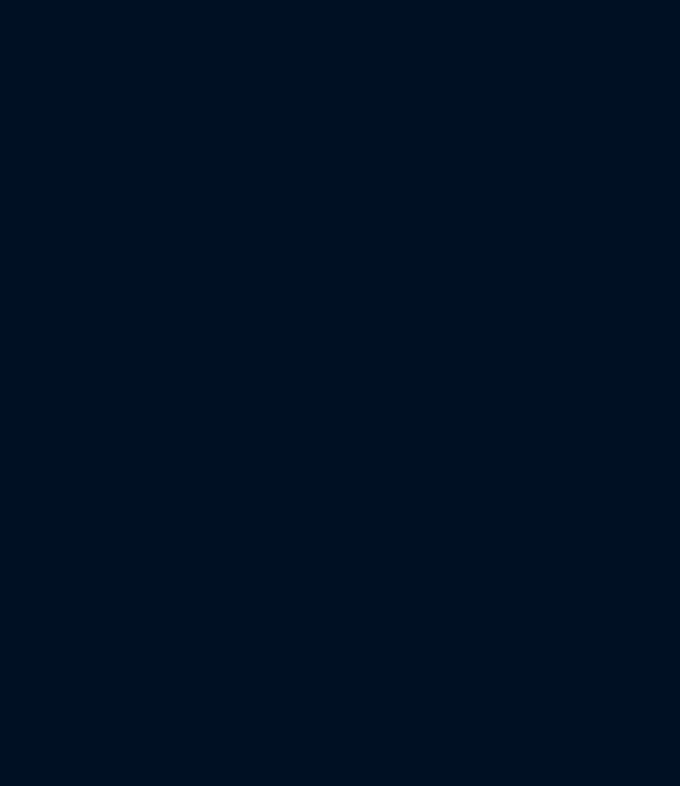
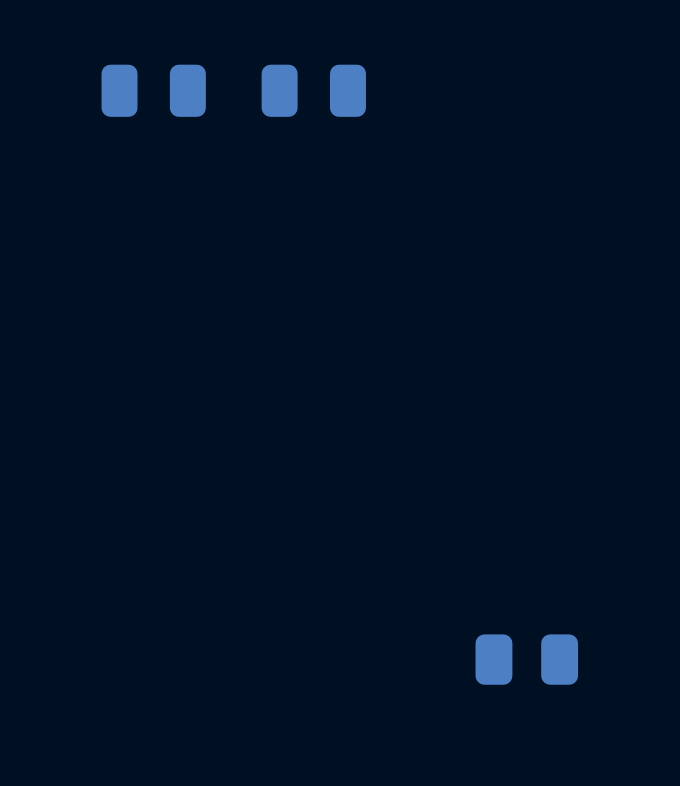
part: none -> (153, 90)
part: none -> (313, 90)
part: none -> (526, 659)

